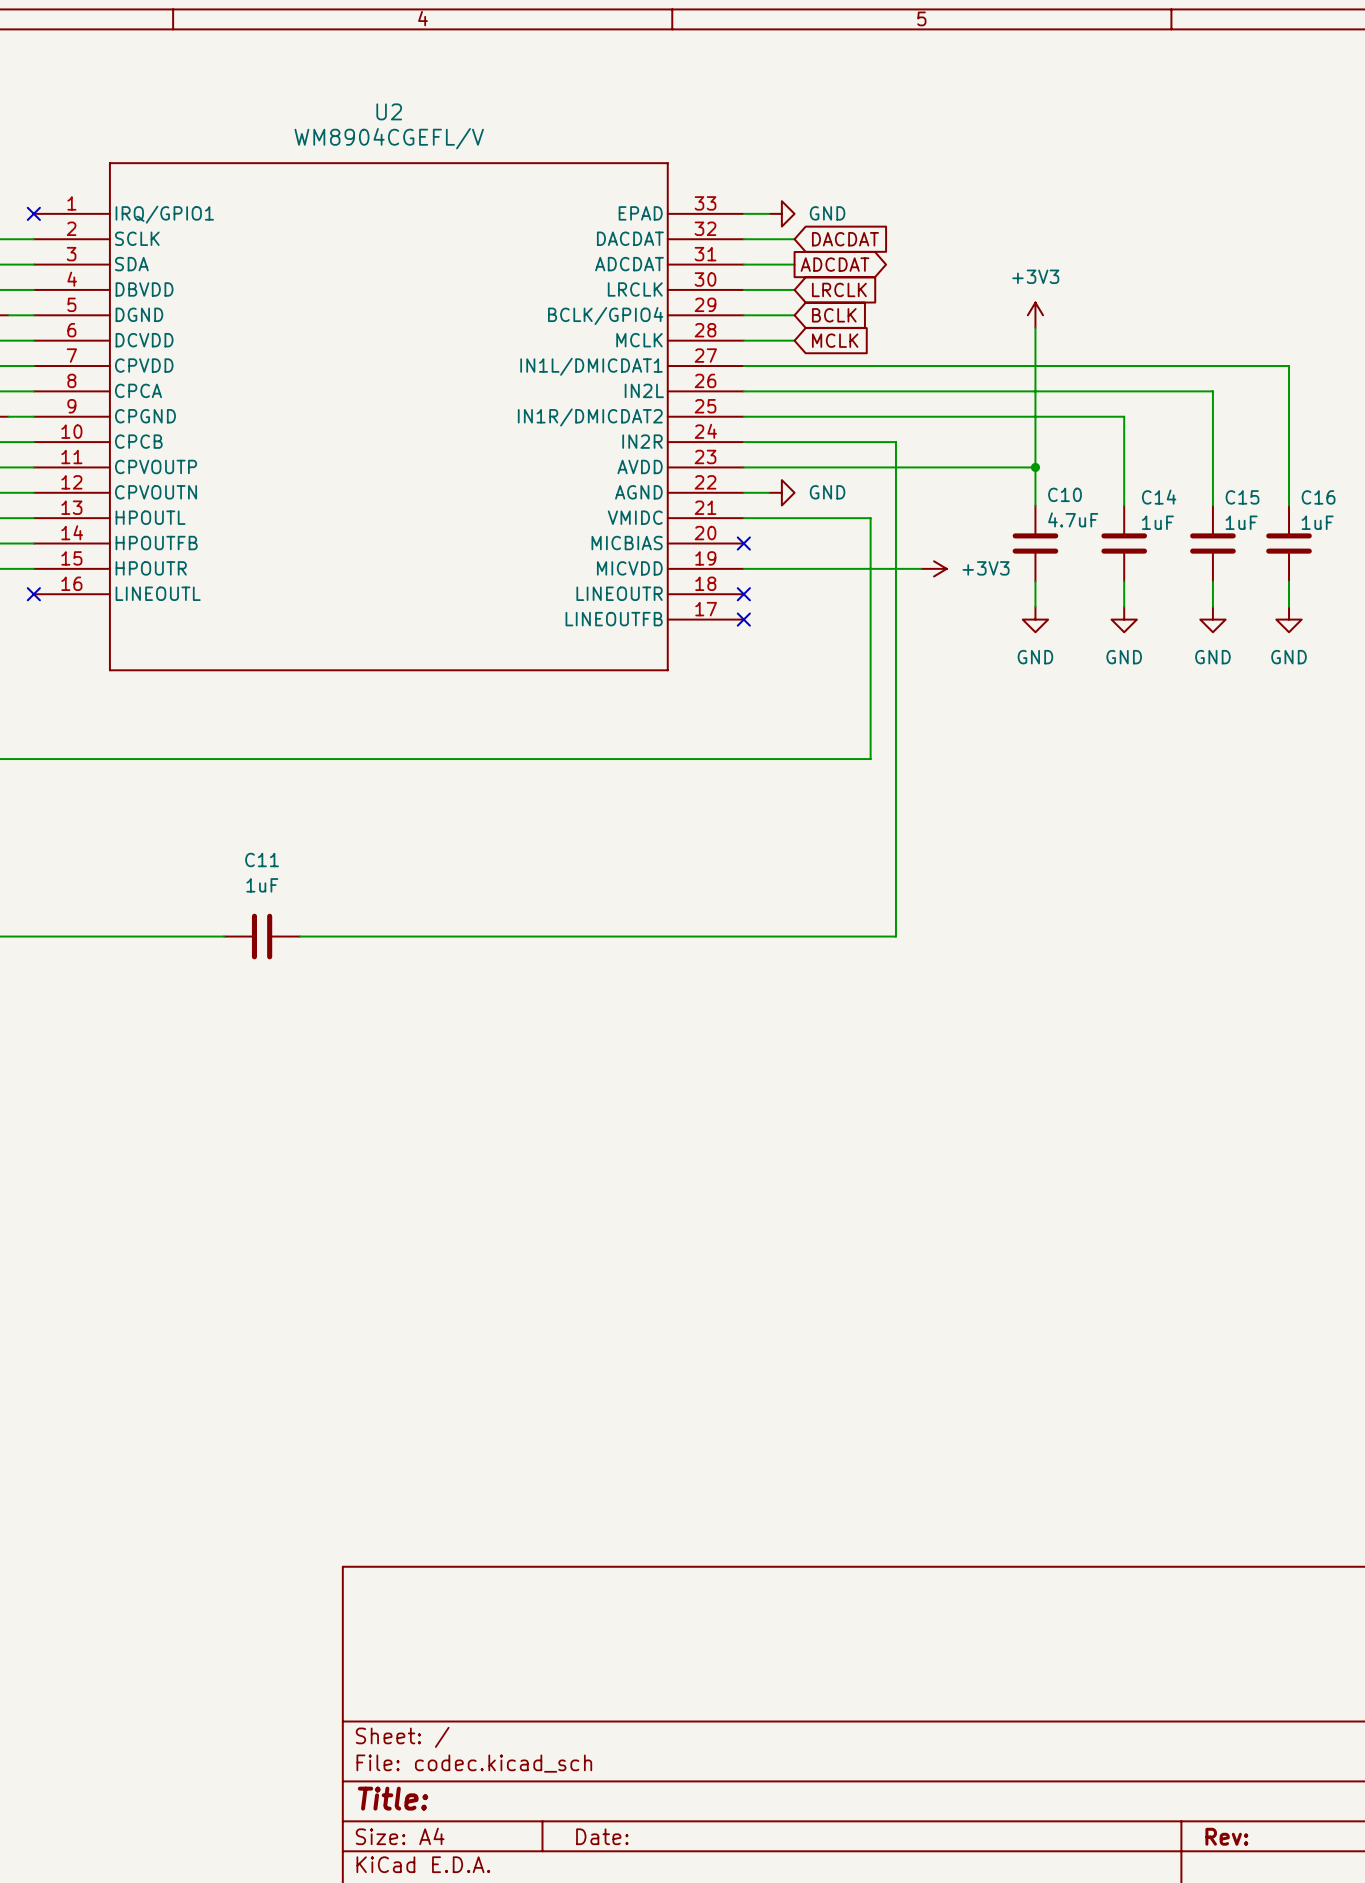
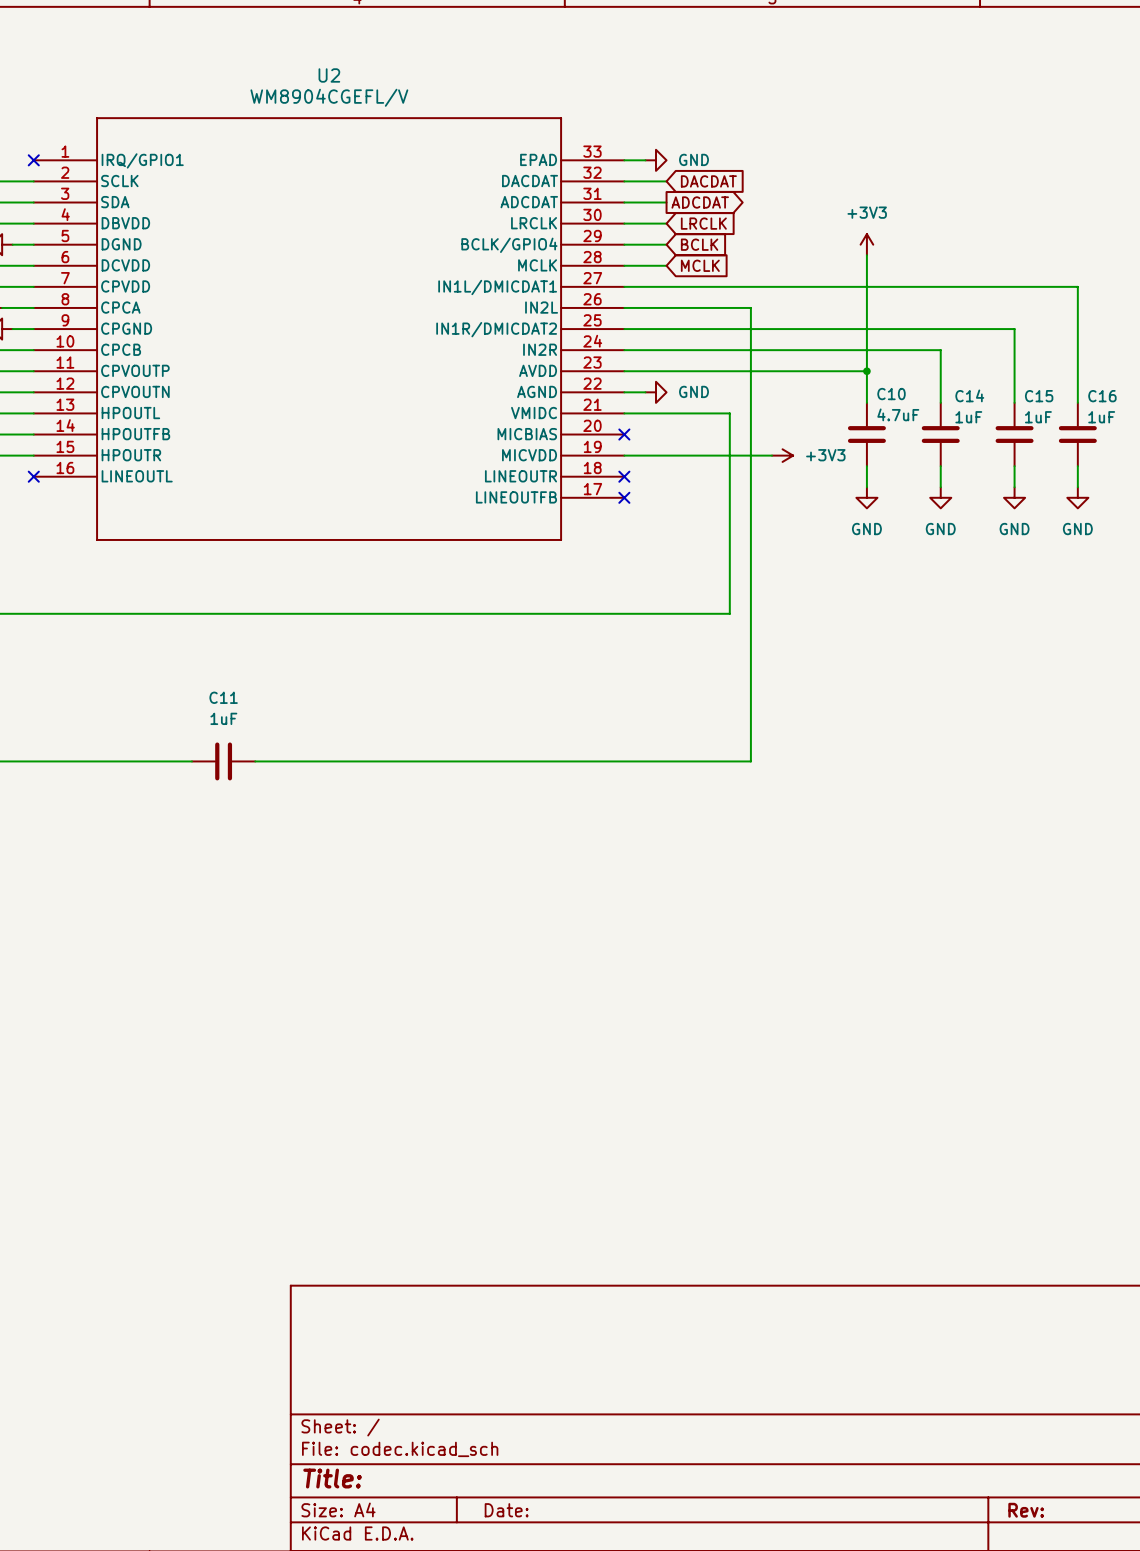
wire: (895, 391) (1212, 391) (1212, 416) -> (750, 307) (750, 350) (940, 350)
wire: (1124, 416) (1124, 442) -> (940, 329) (1014, 329)

